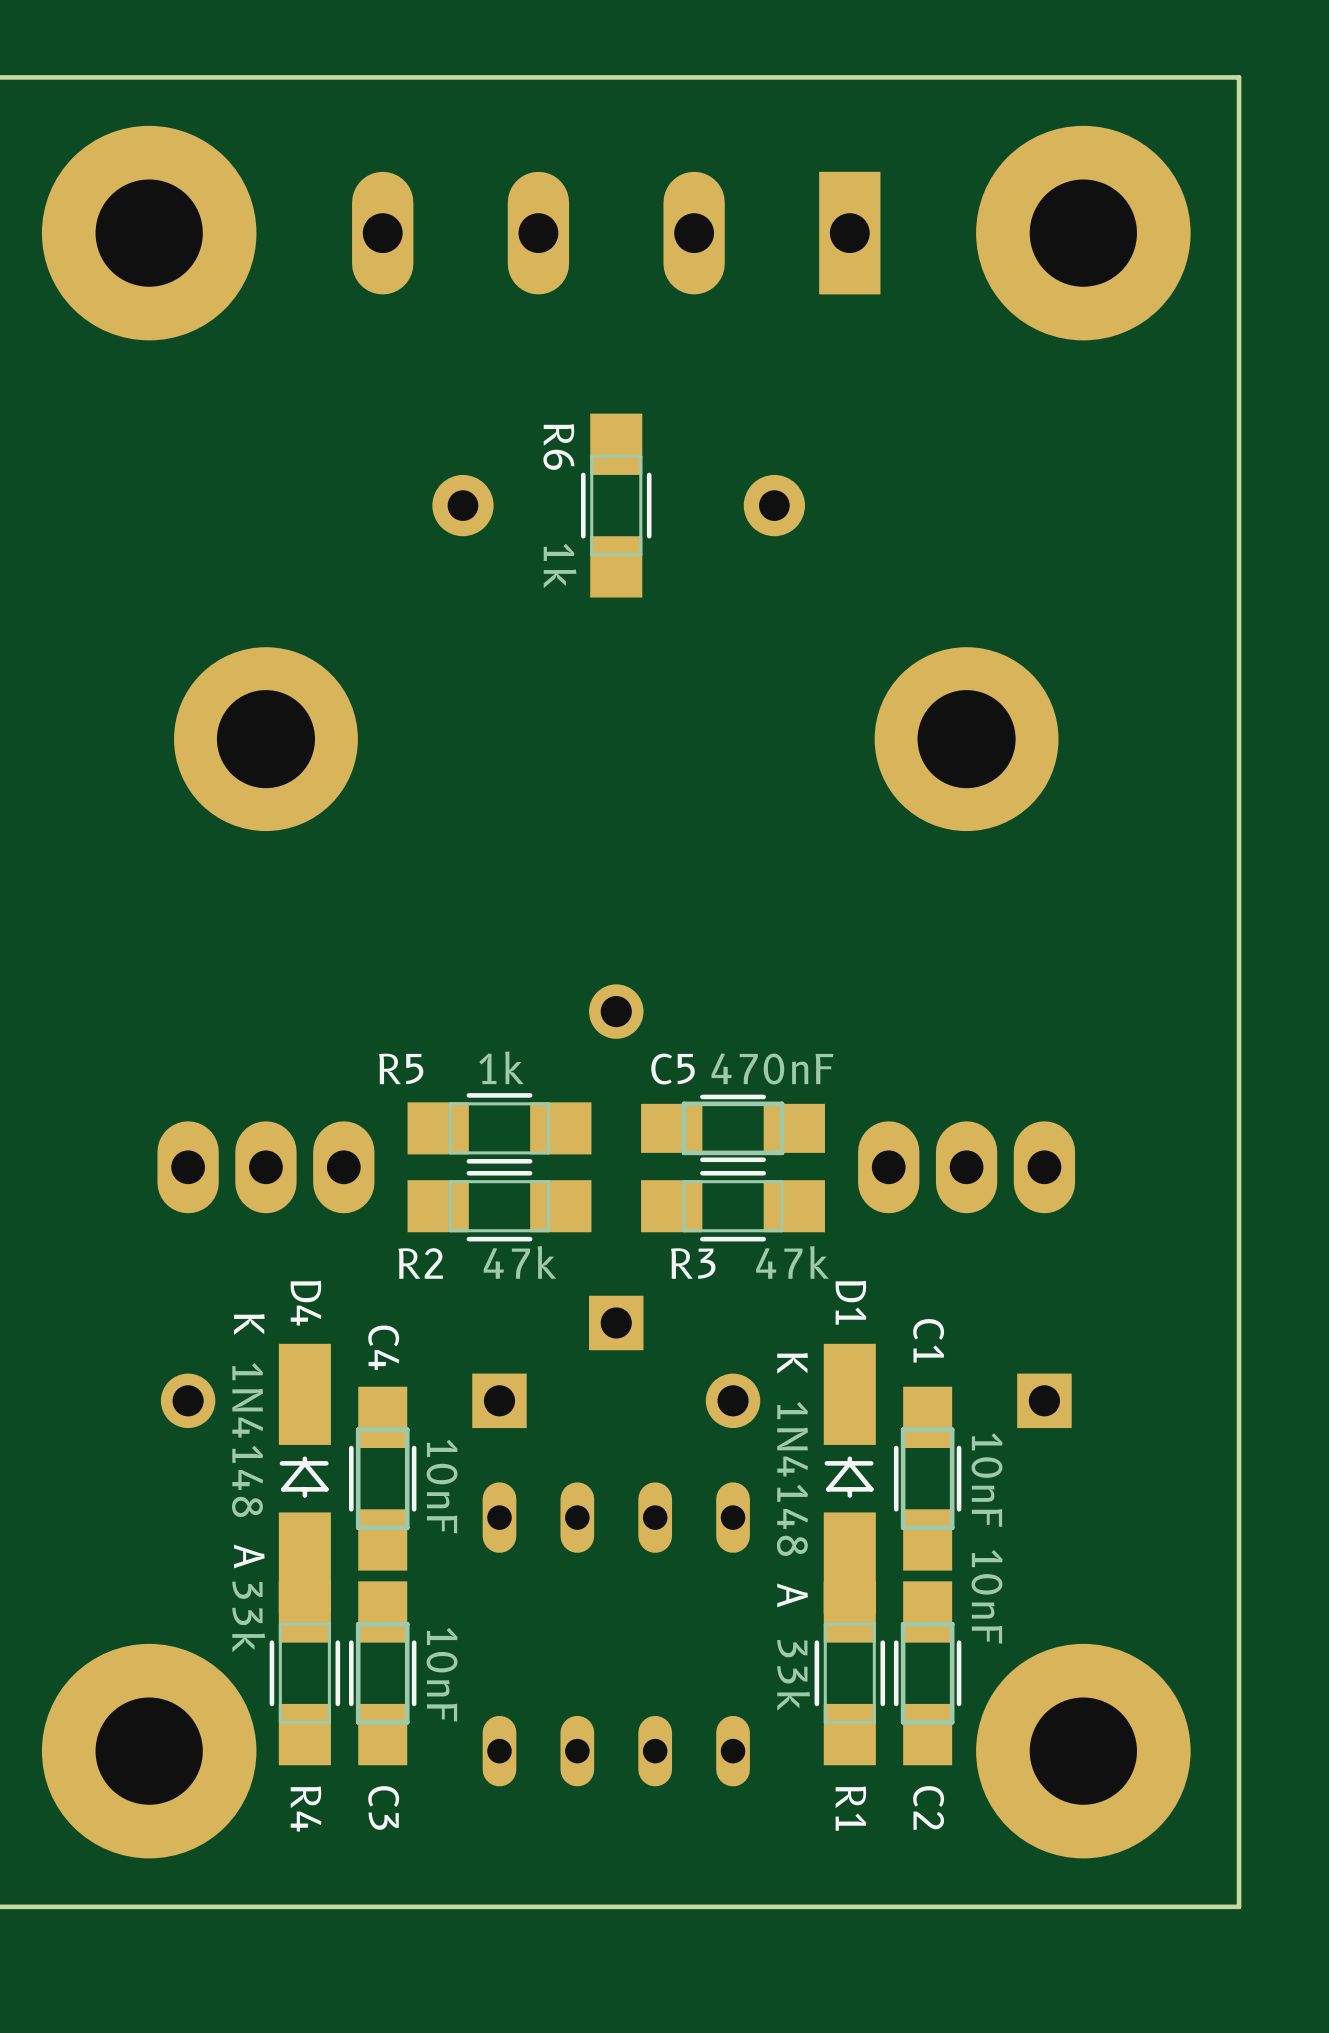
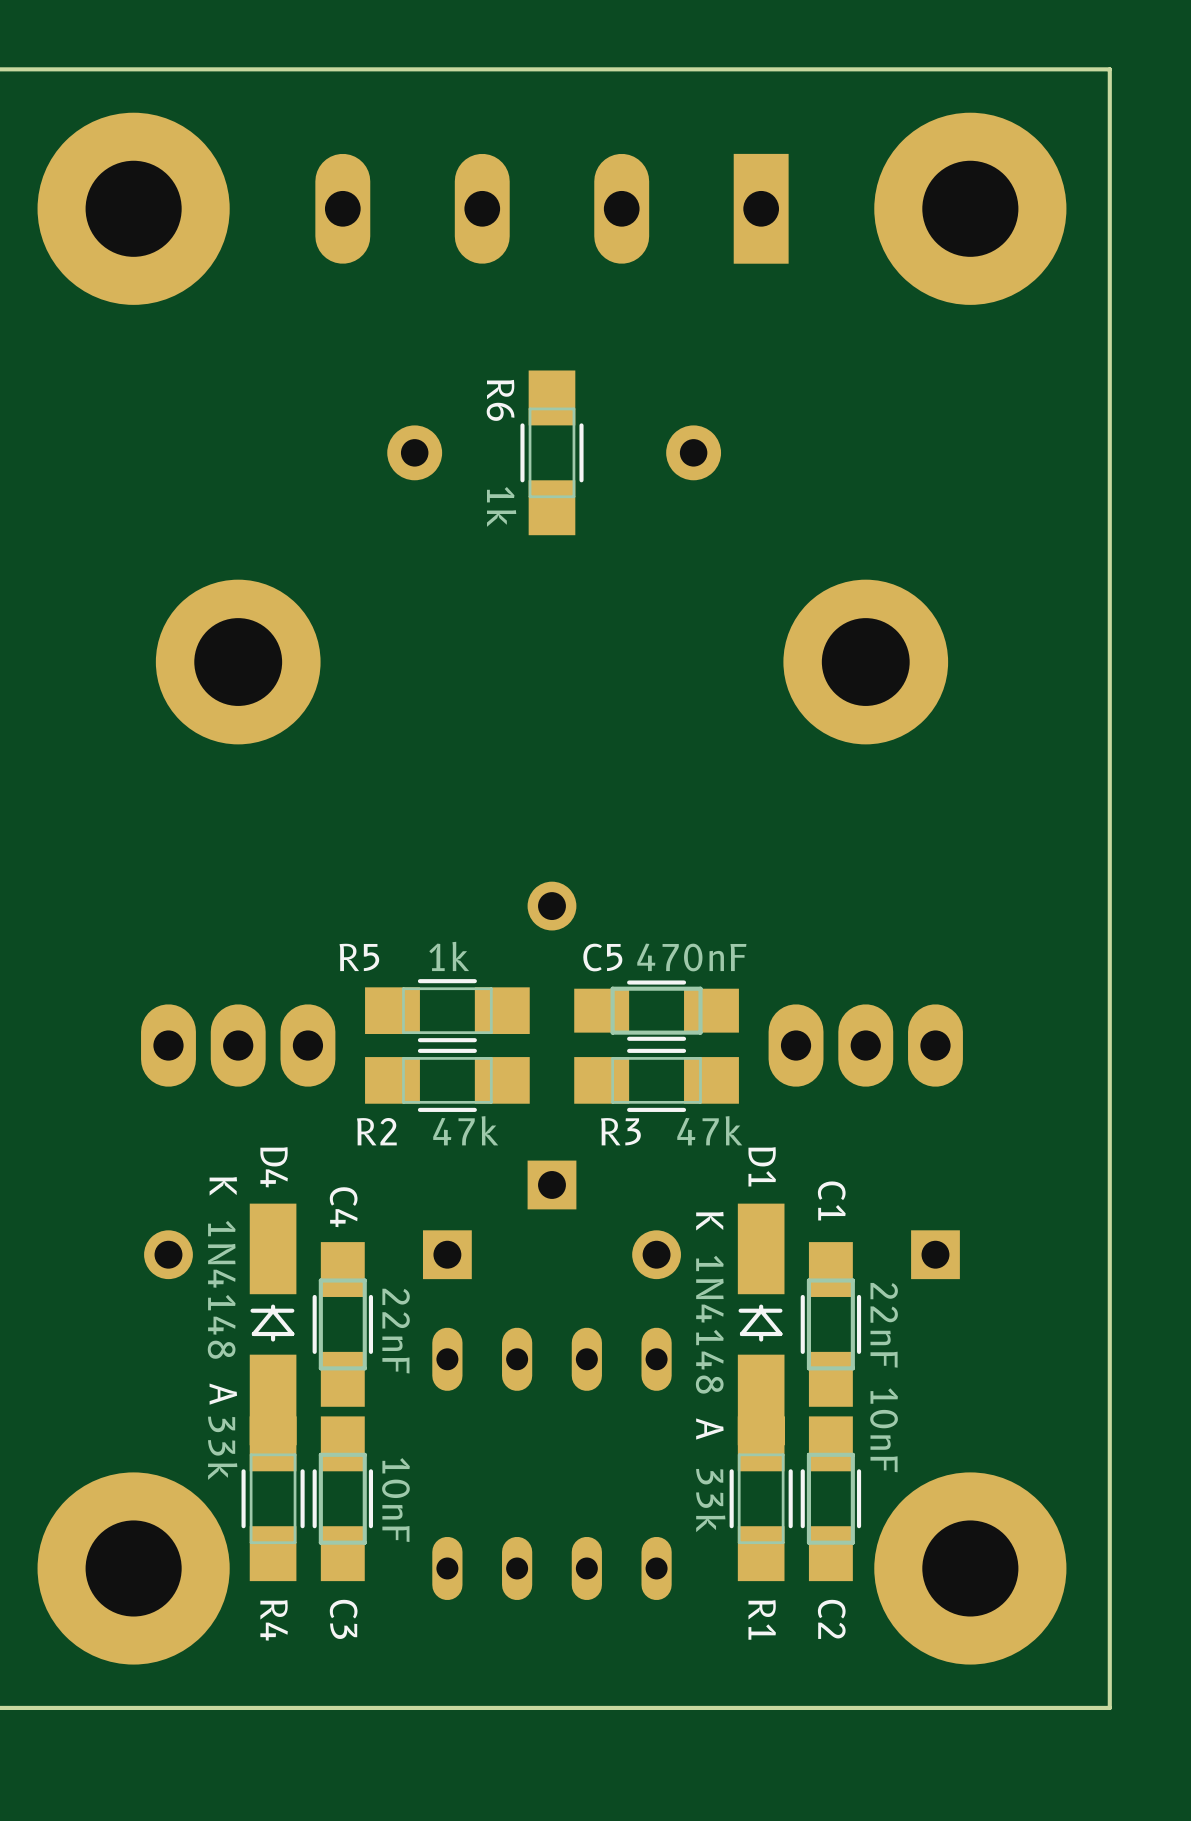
C1 value: 10nF (987, 1480) -> 22nF (884, 1325)
C4 value: 10nF (442, 1486) -> 22nF (396, 1331)

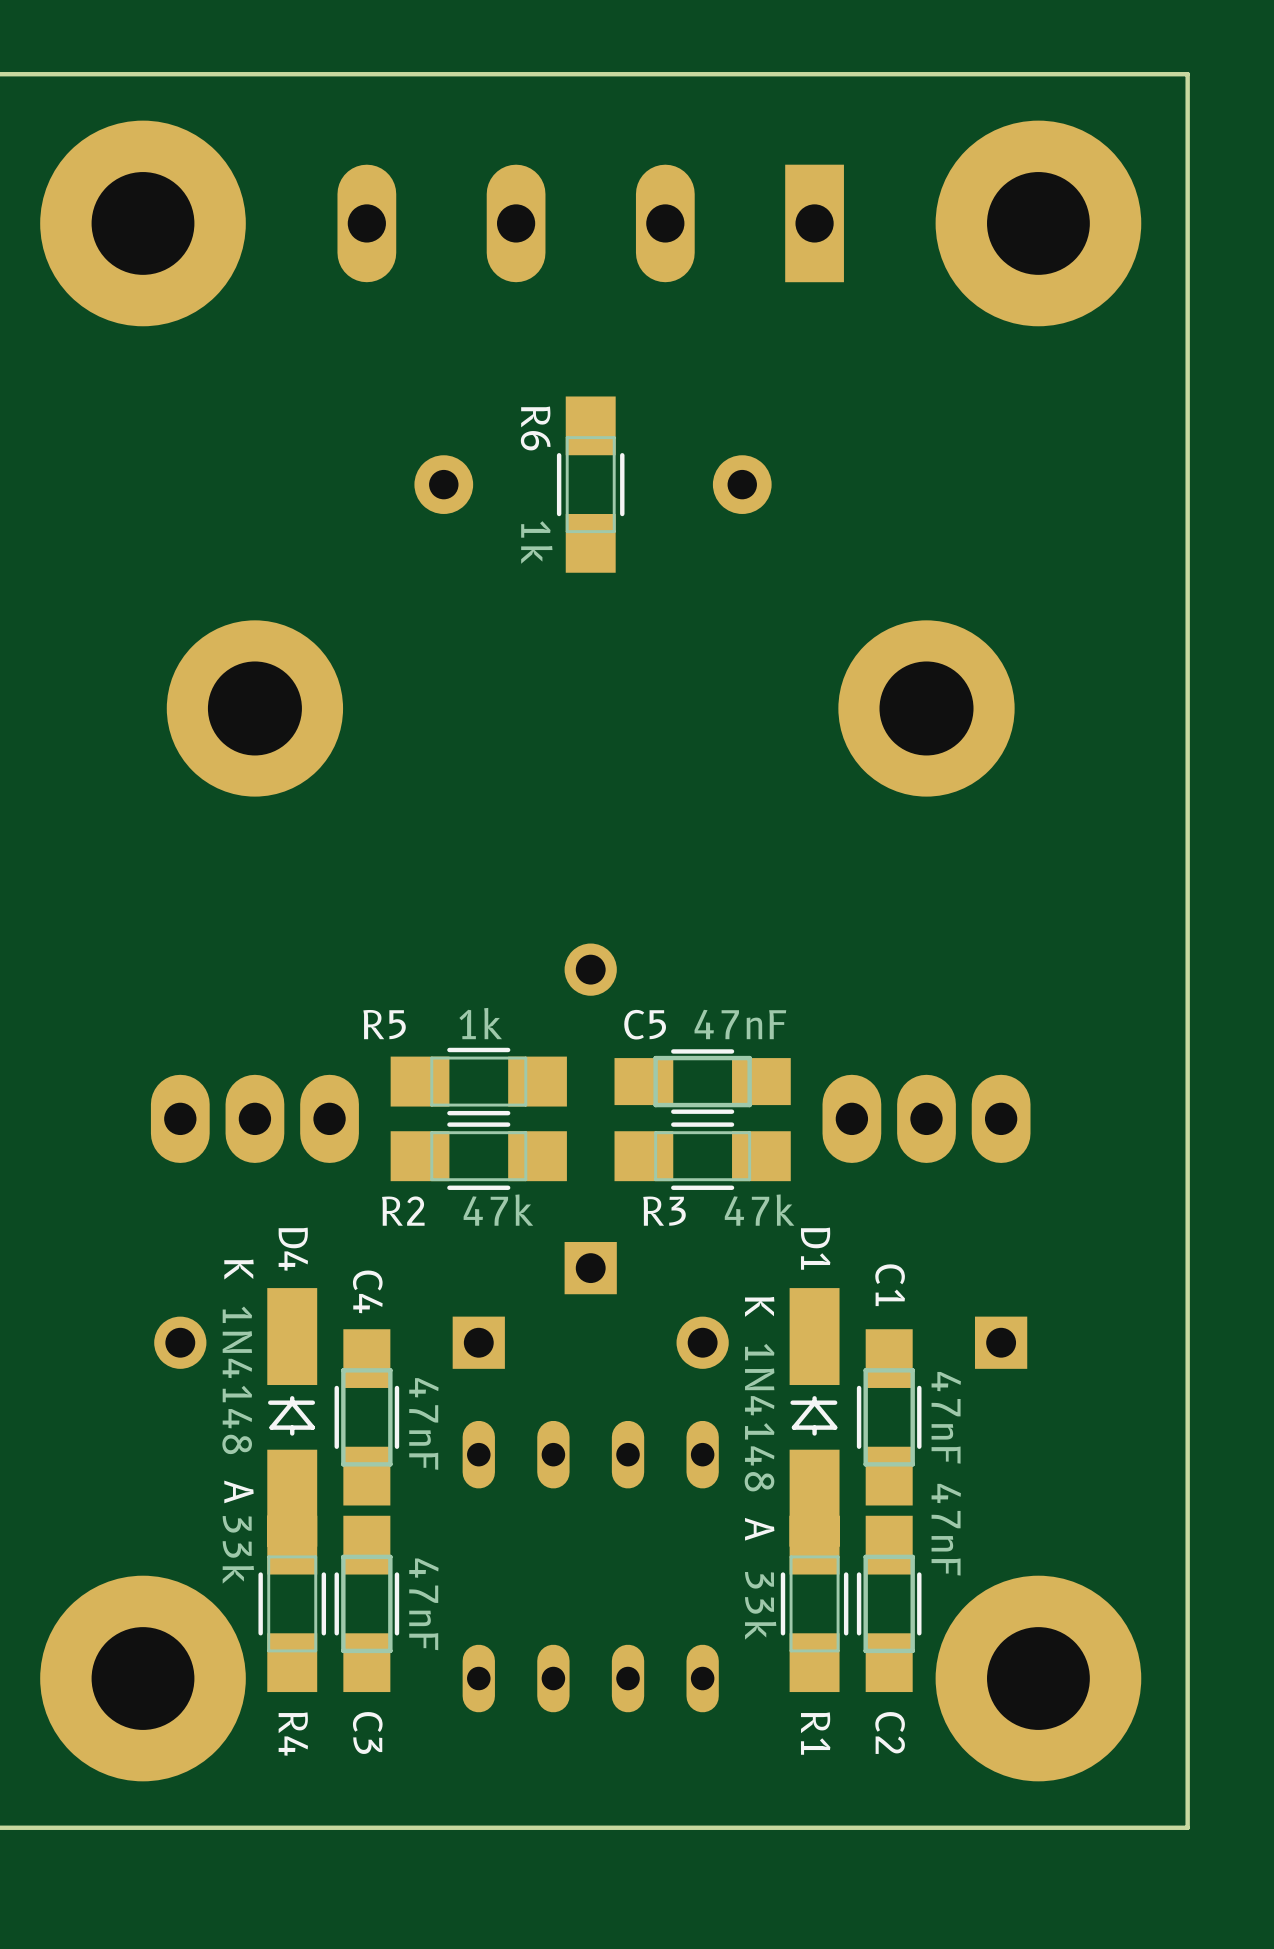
C5 value: 470nF (691, 957) -> 47nF (740, 1024)
C1 value: 22nF (884, 1325) -> 47nF (946, 1417)
C4 value: 22nF (396, 1331) -> 47nF (423, 1423)
C2 value: 10nF (884, 1430) -> 47nF (946, 1529)
C3 value: 10nF (395, 1500) -> 47nF (423, 1604)

